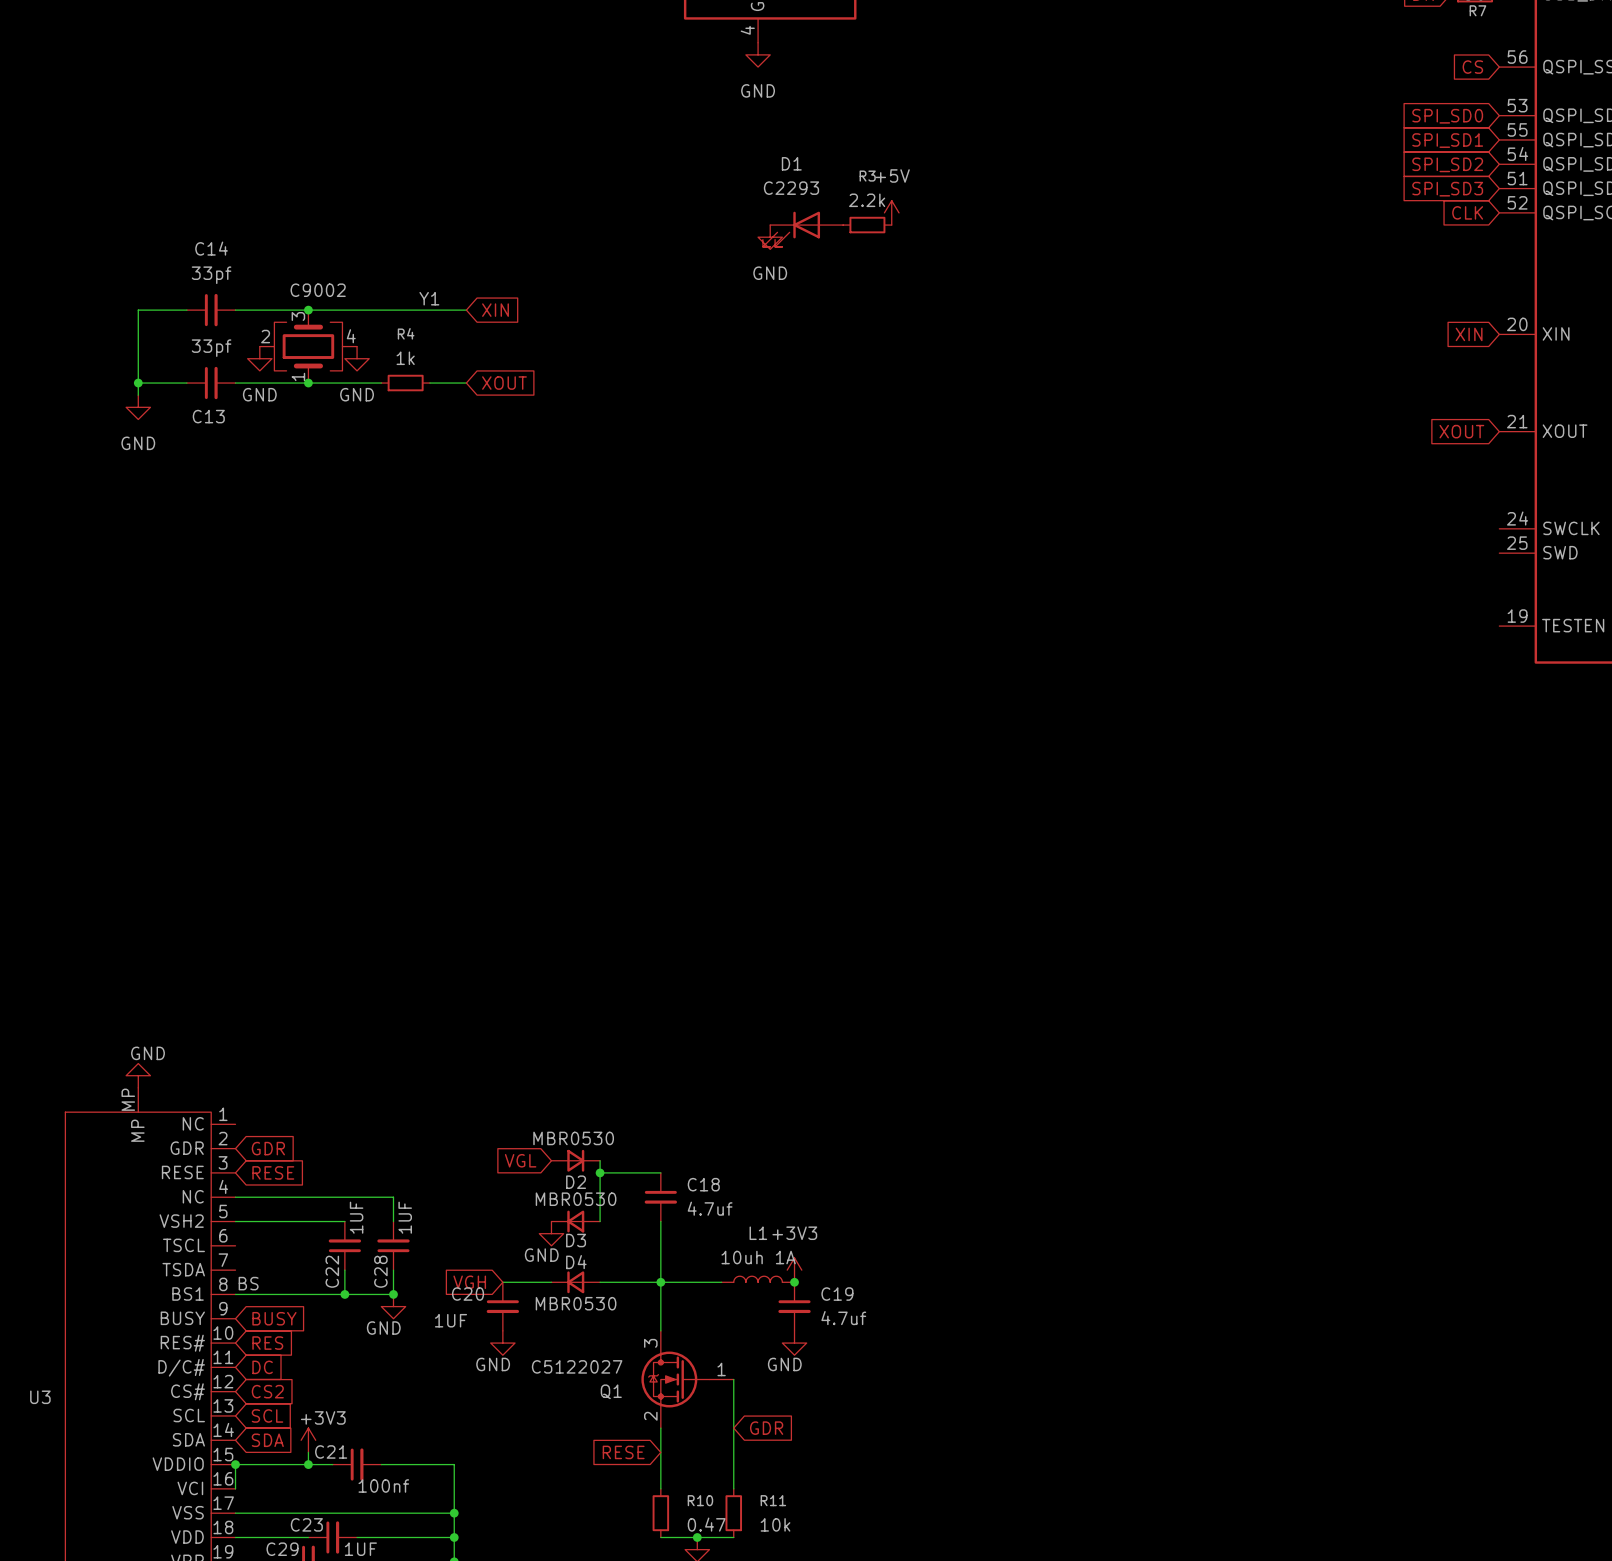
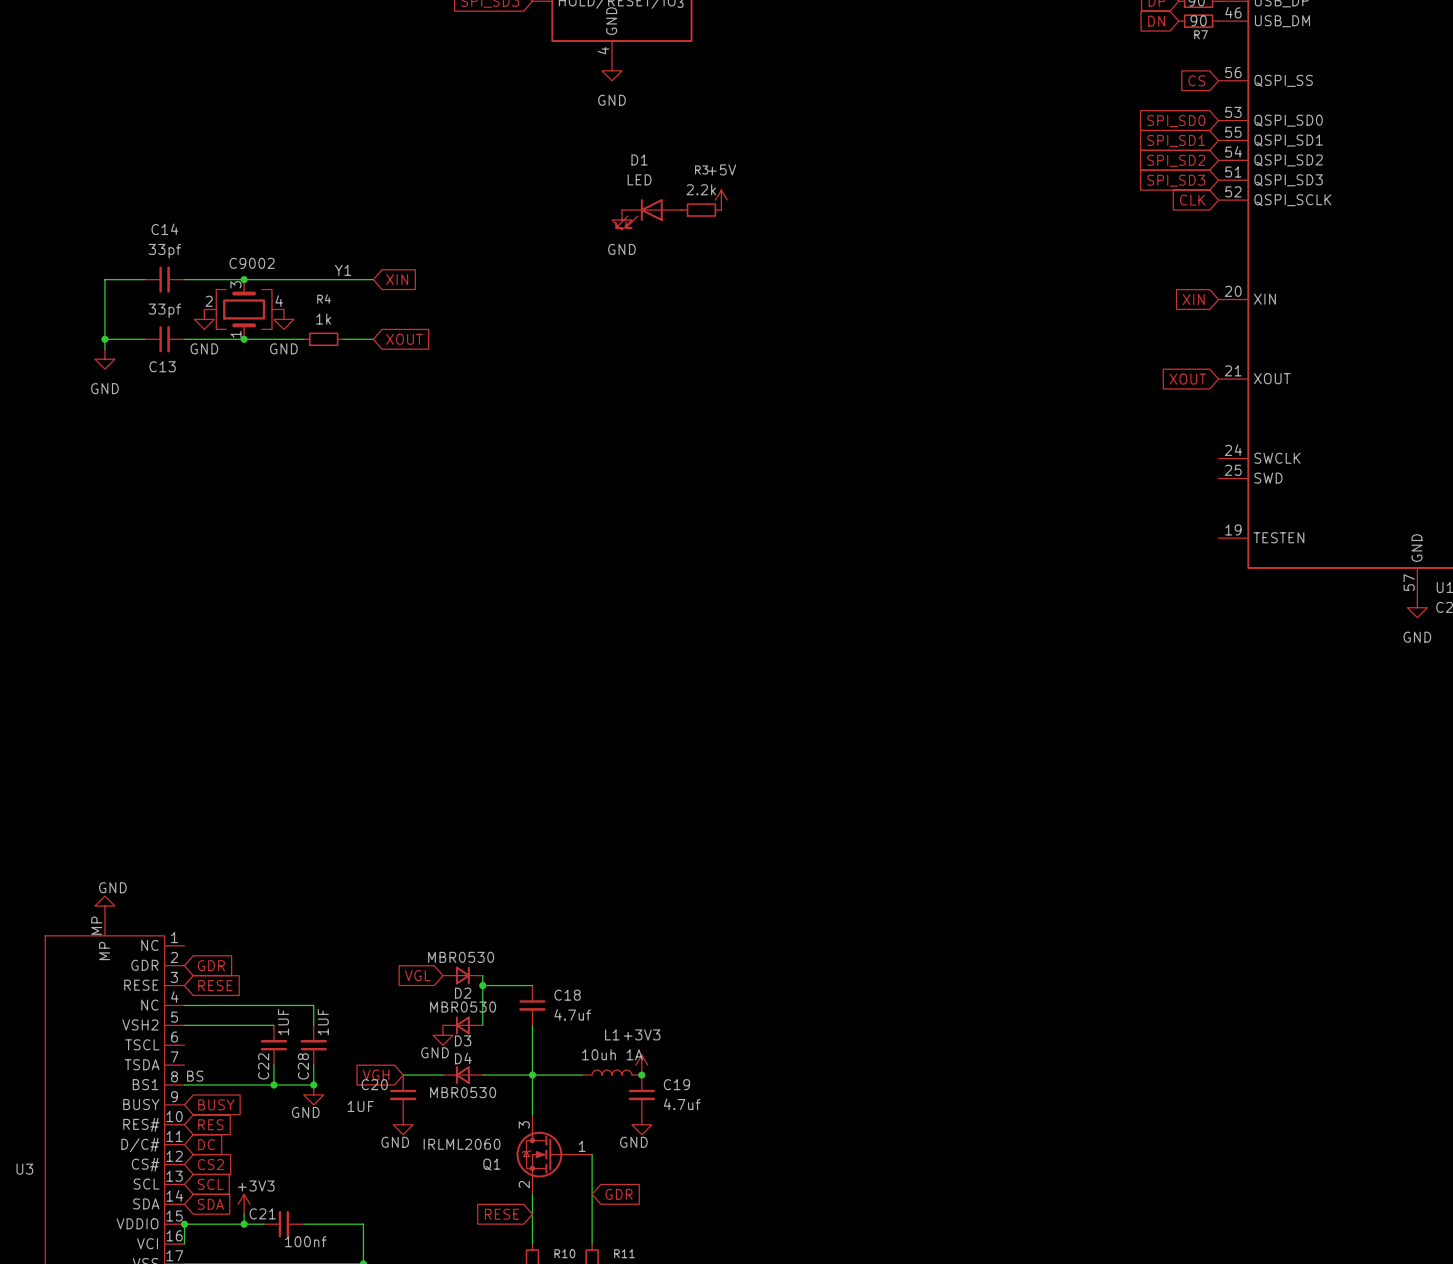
D1 value: C2293 (791, 188) -> LED (639, 179)
Q1 value: C5122027 (577, 1366) -> IRLML2060 (462, 1144)

